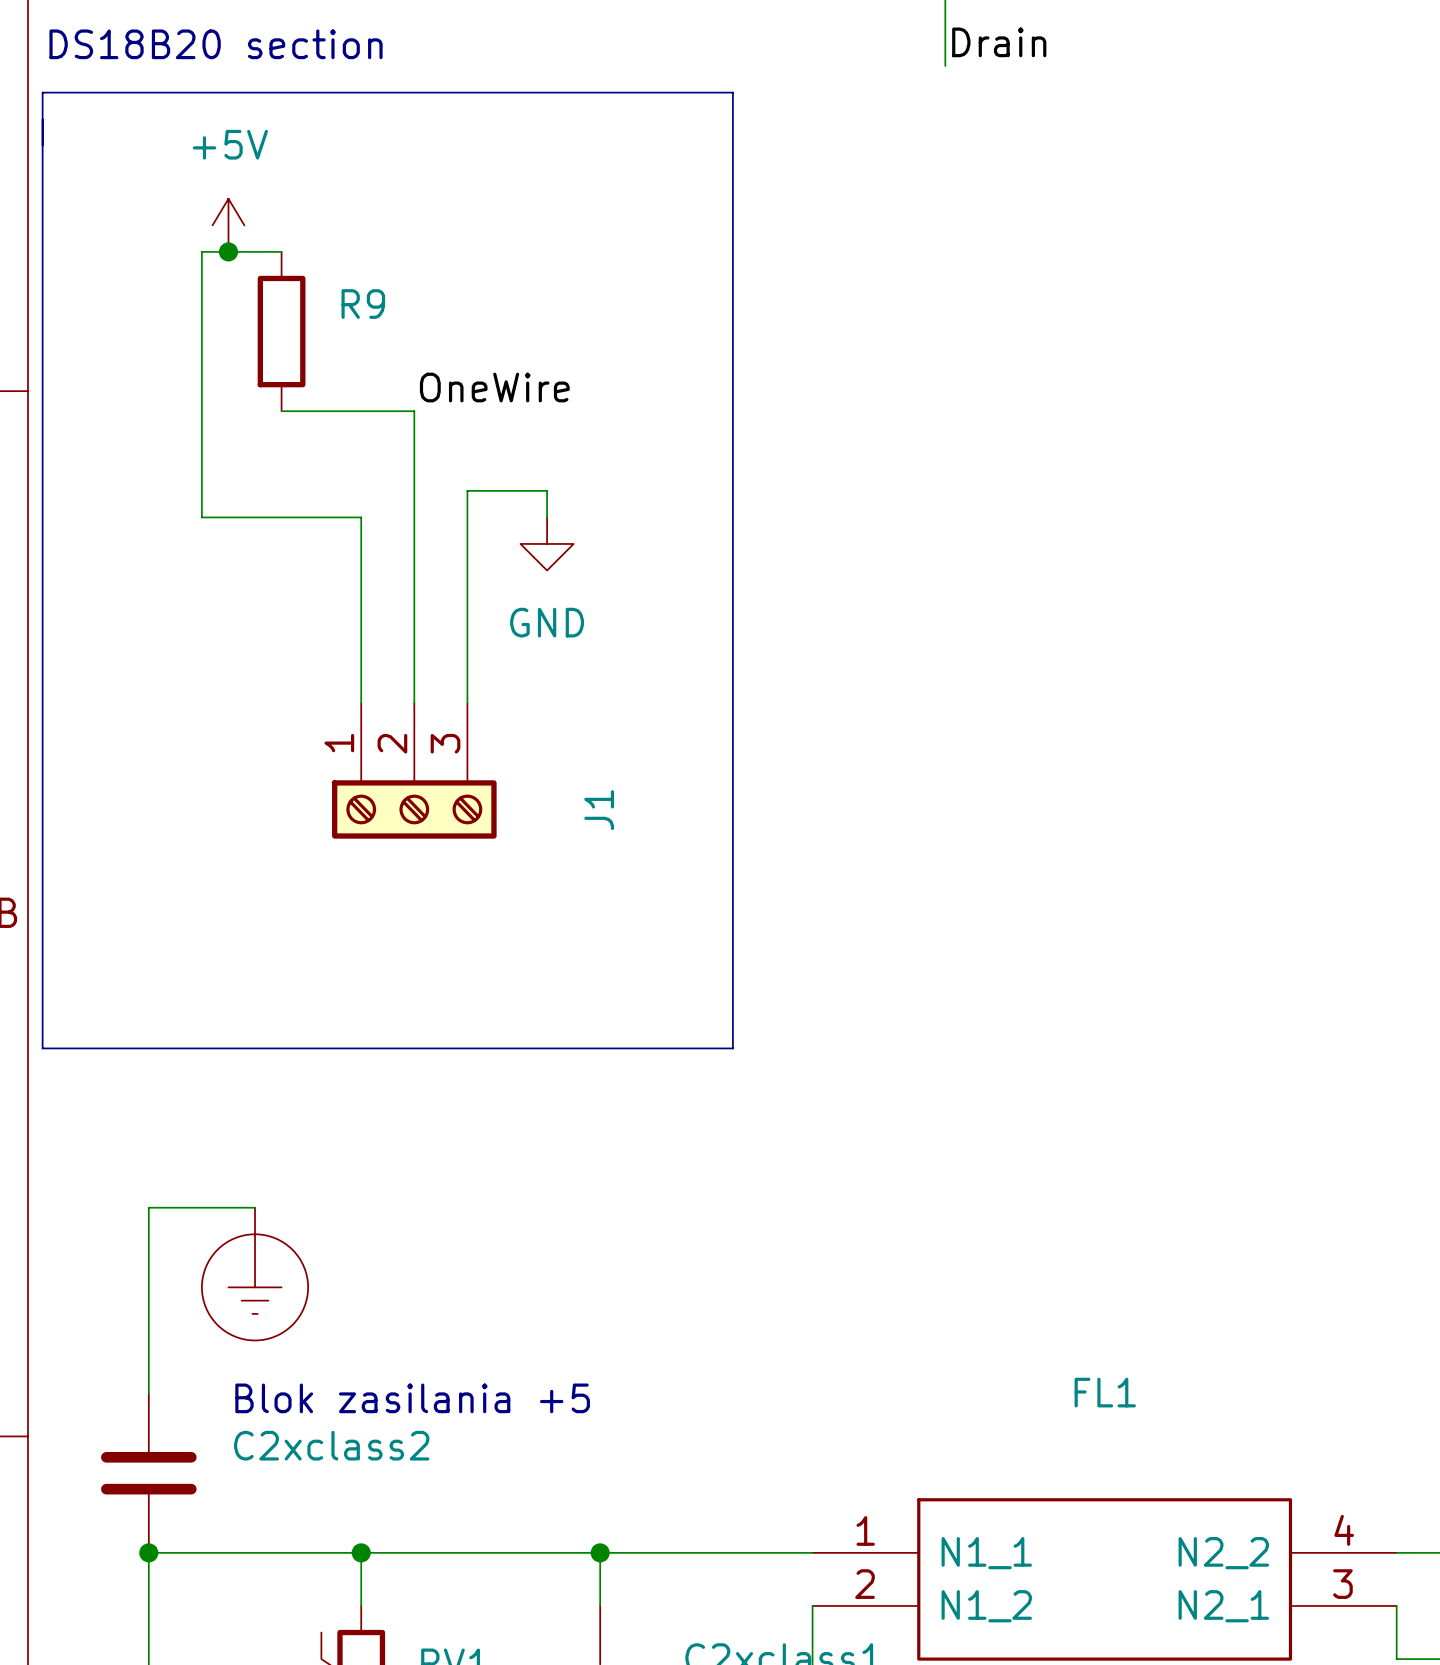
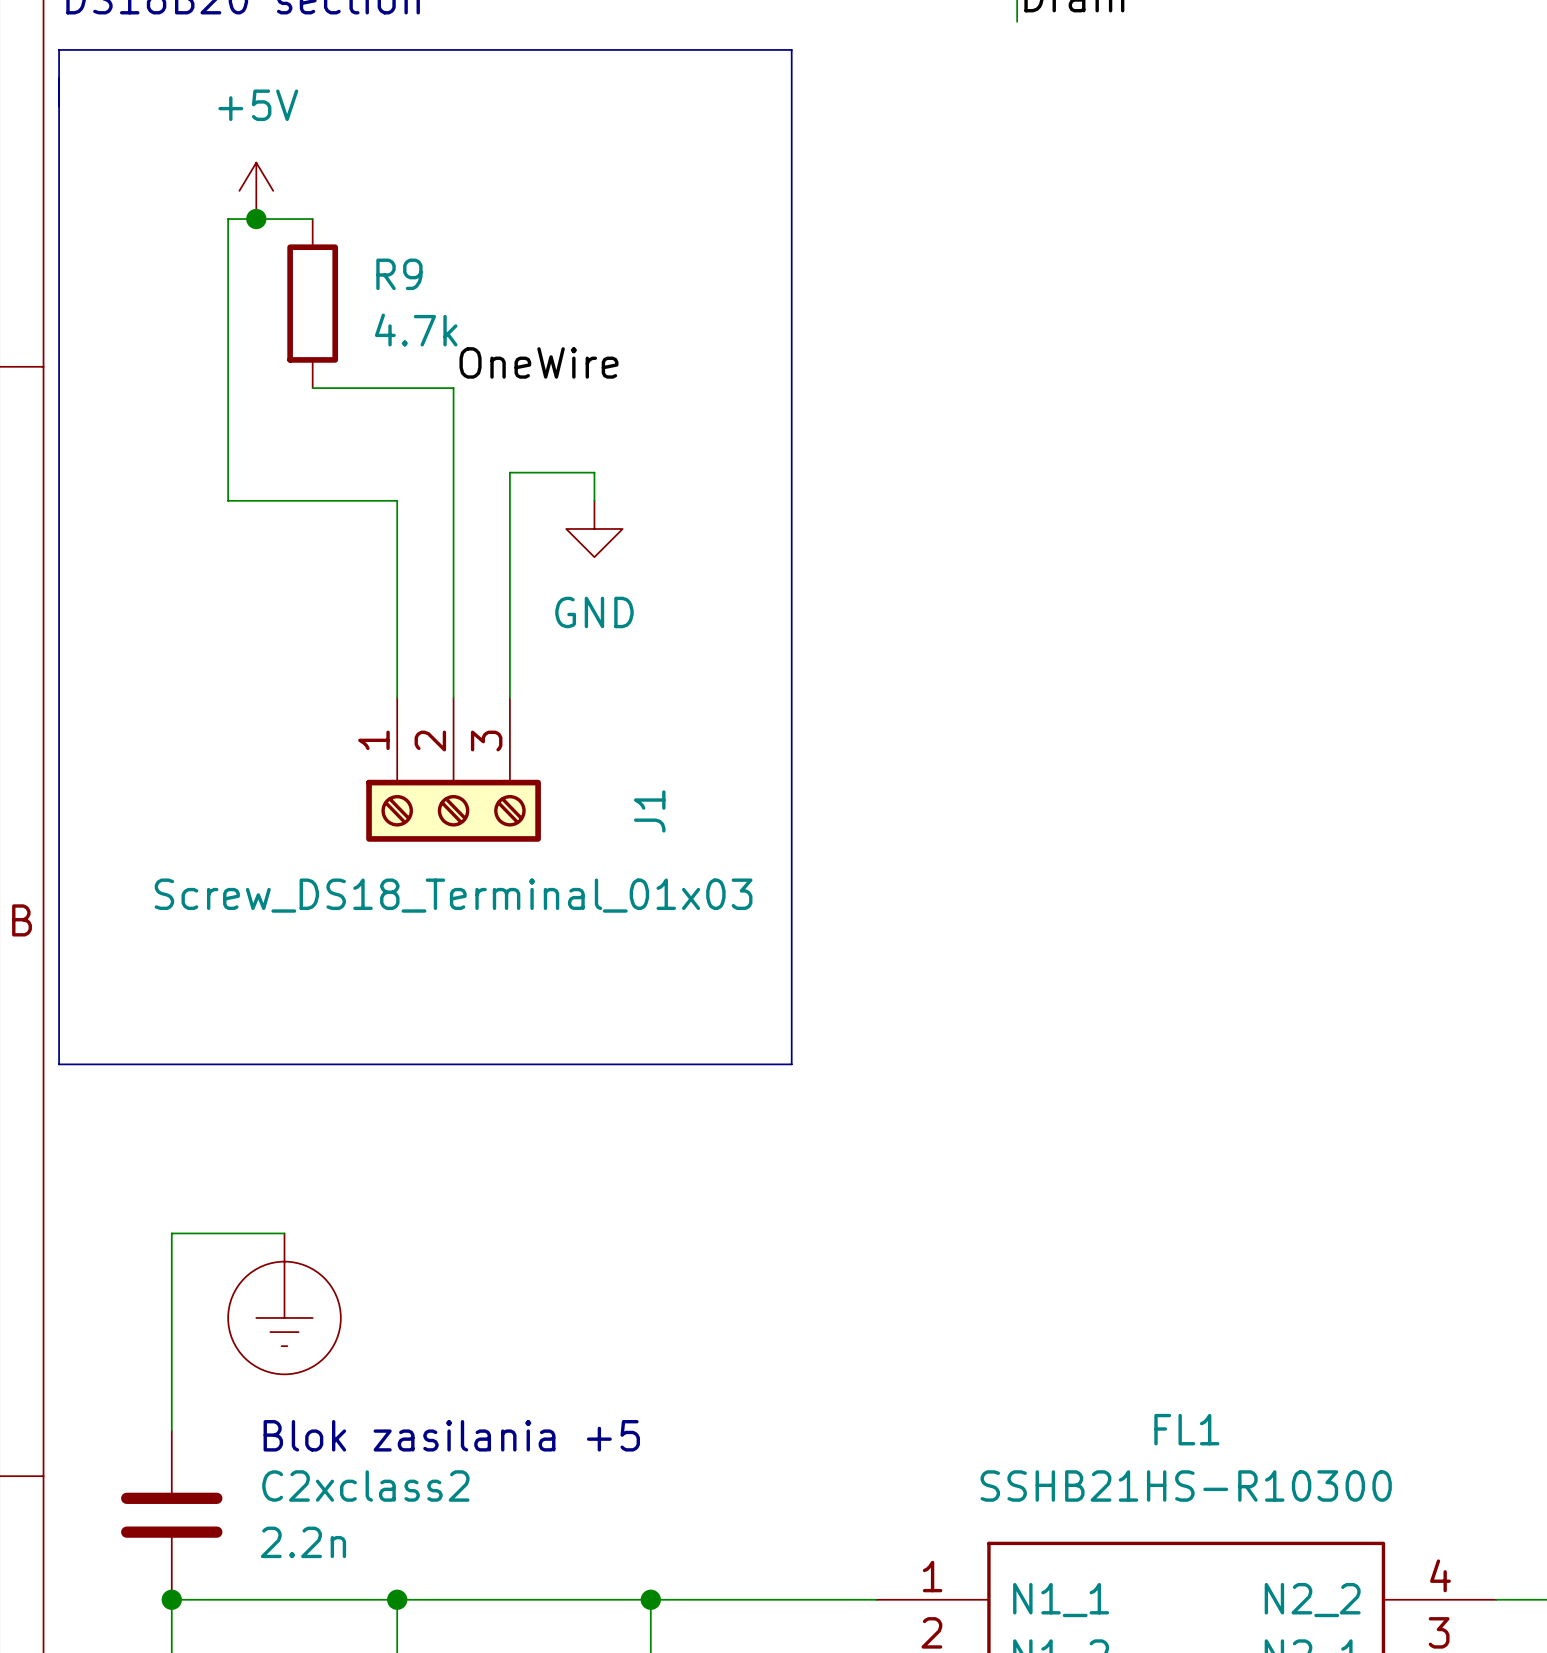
R9 value: none -> 4.7k (416, 330)
J1 value: none -> Screw_DS18_Terminal_01x03 (453, 895)
FL1 value: none -> SSHB21HS-R10300 (1186, 1486)
C2xclass2 value: none -> 2.2n (303, 1542)

